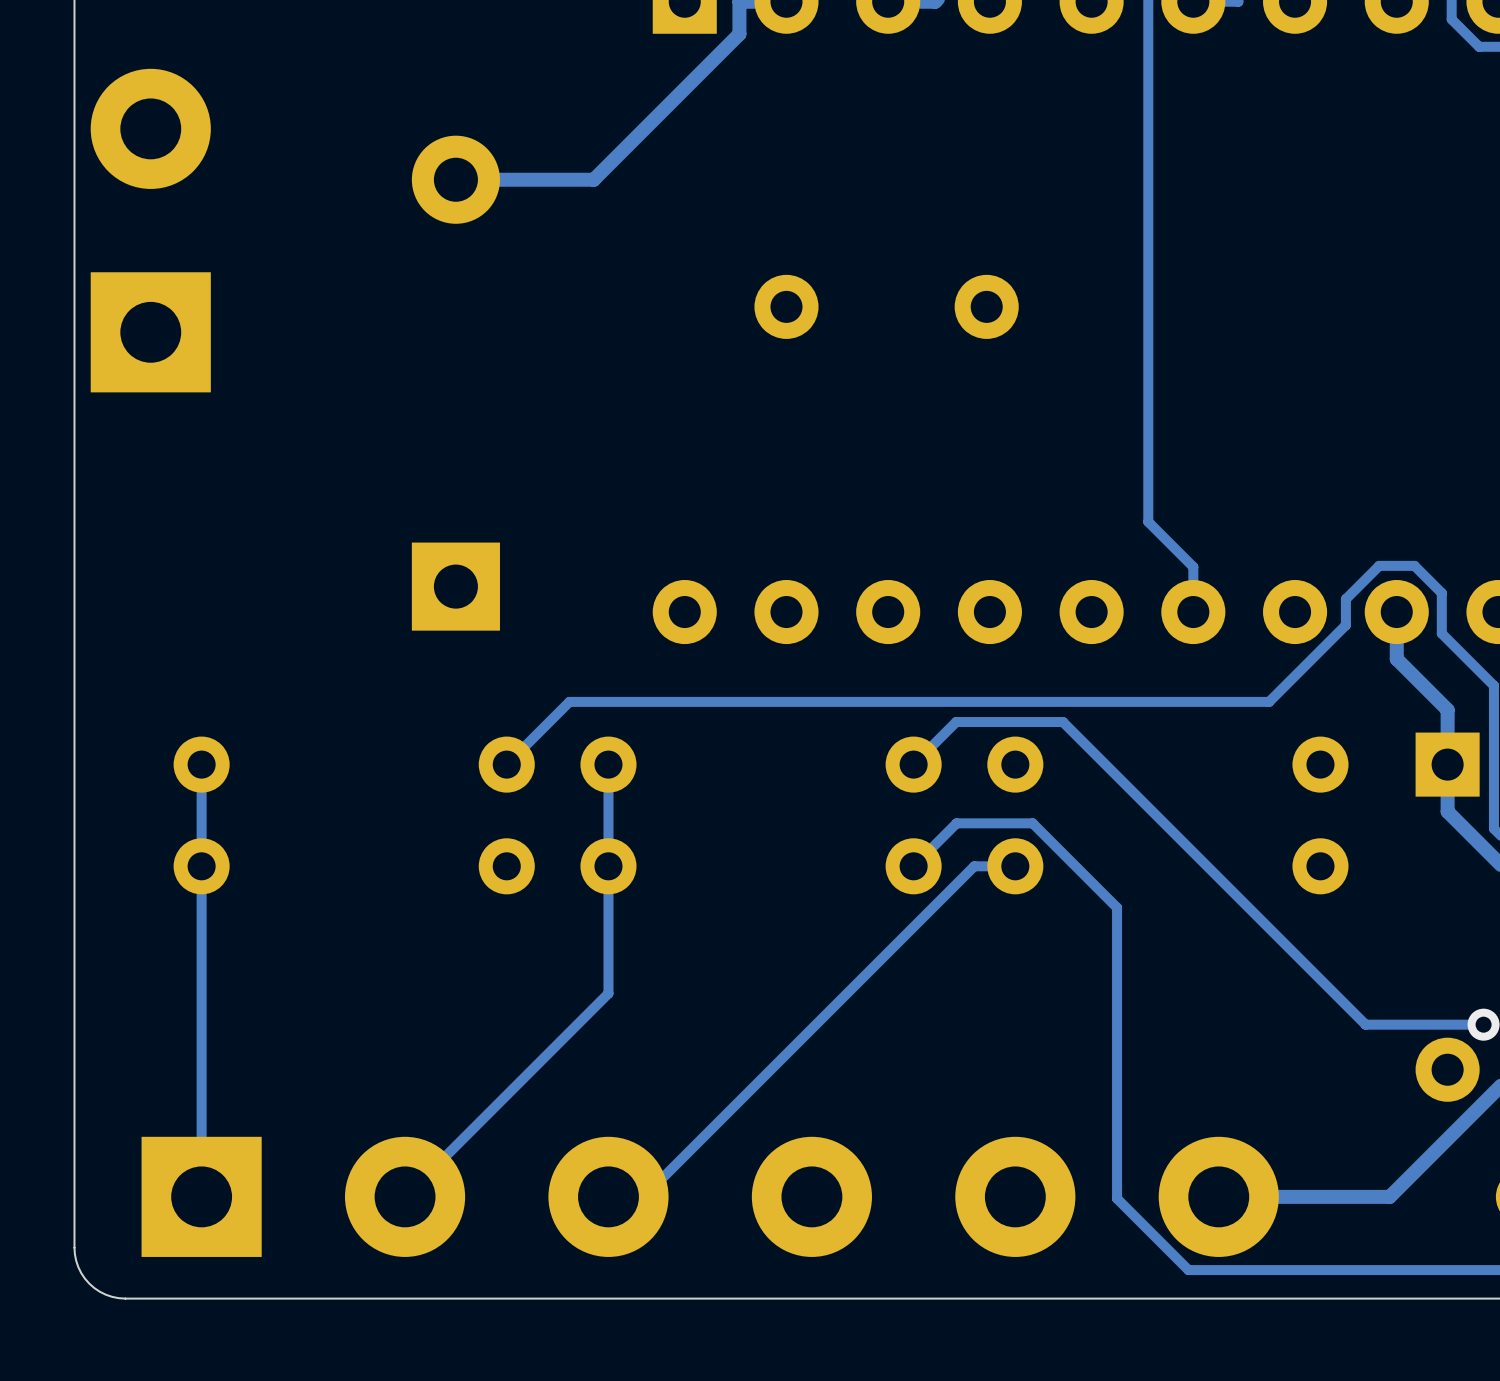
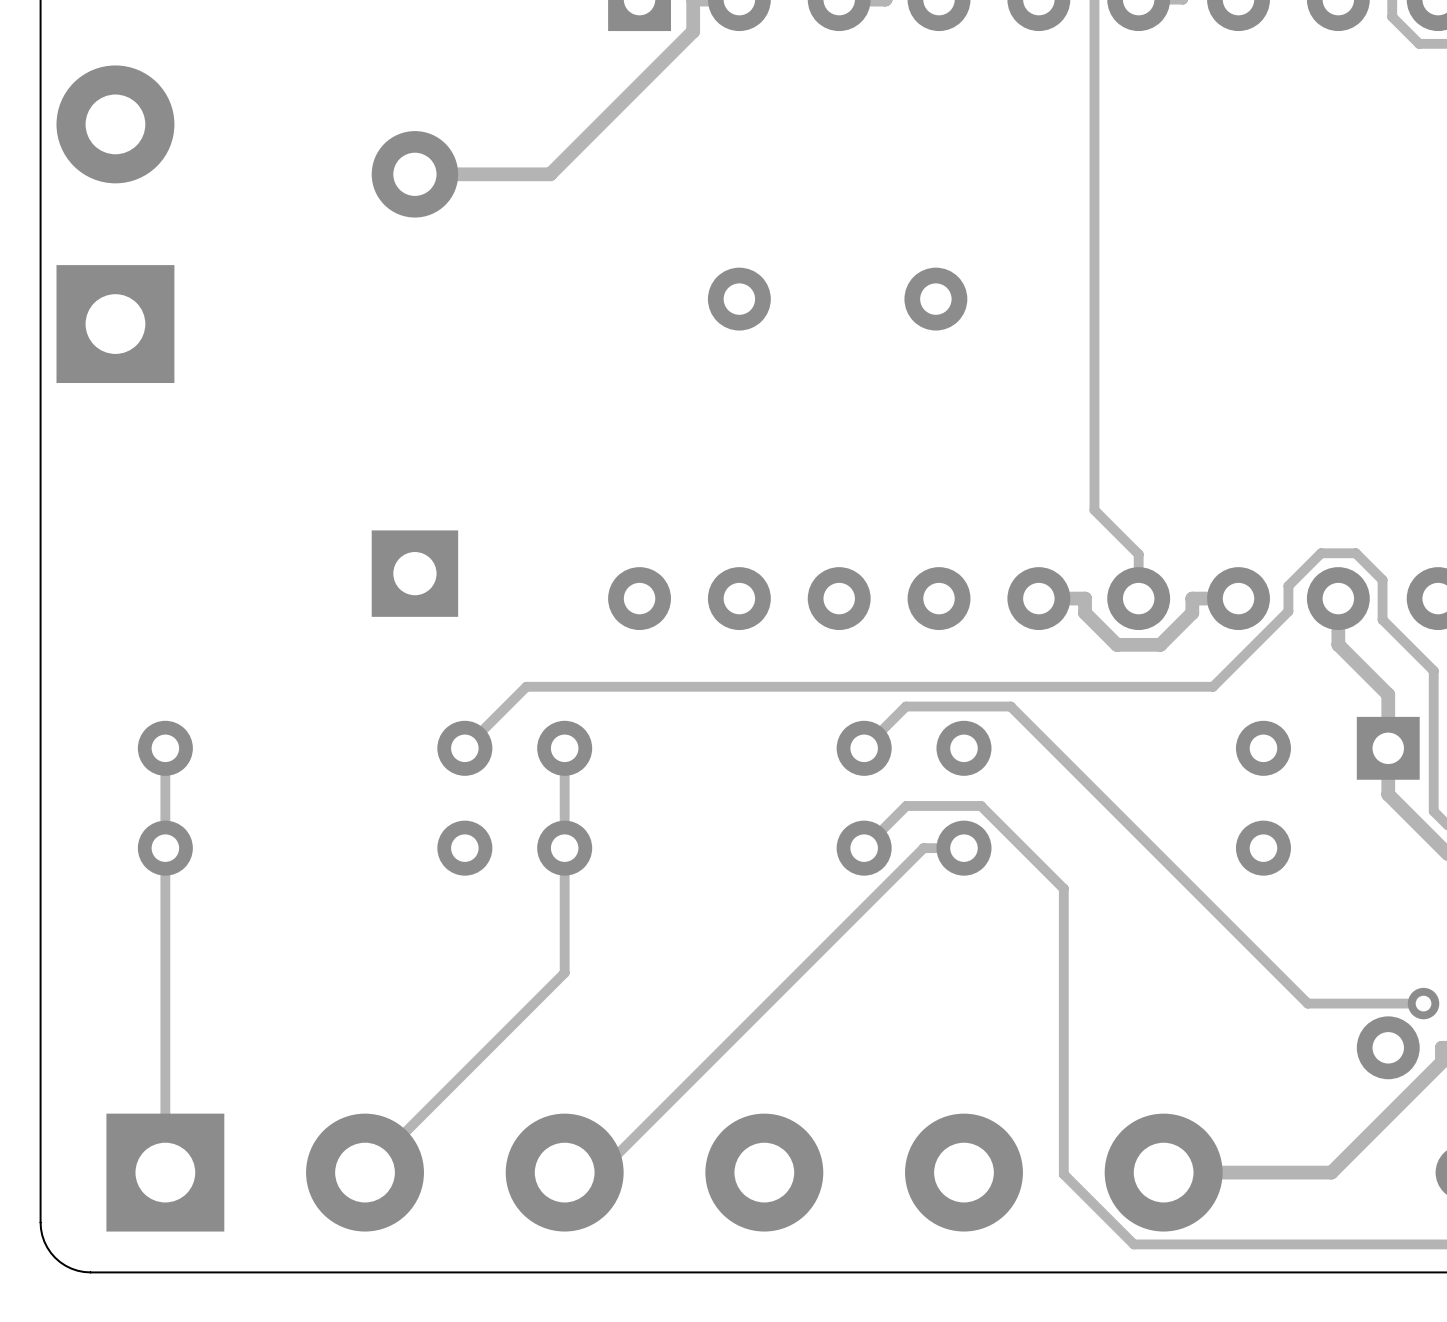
track: none -> (1238, 598) (1192, 598) (1192, 612) (1160, 644) (1116, 644) (1085, 613) (1085, 598) (1038, 598)

